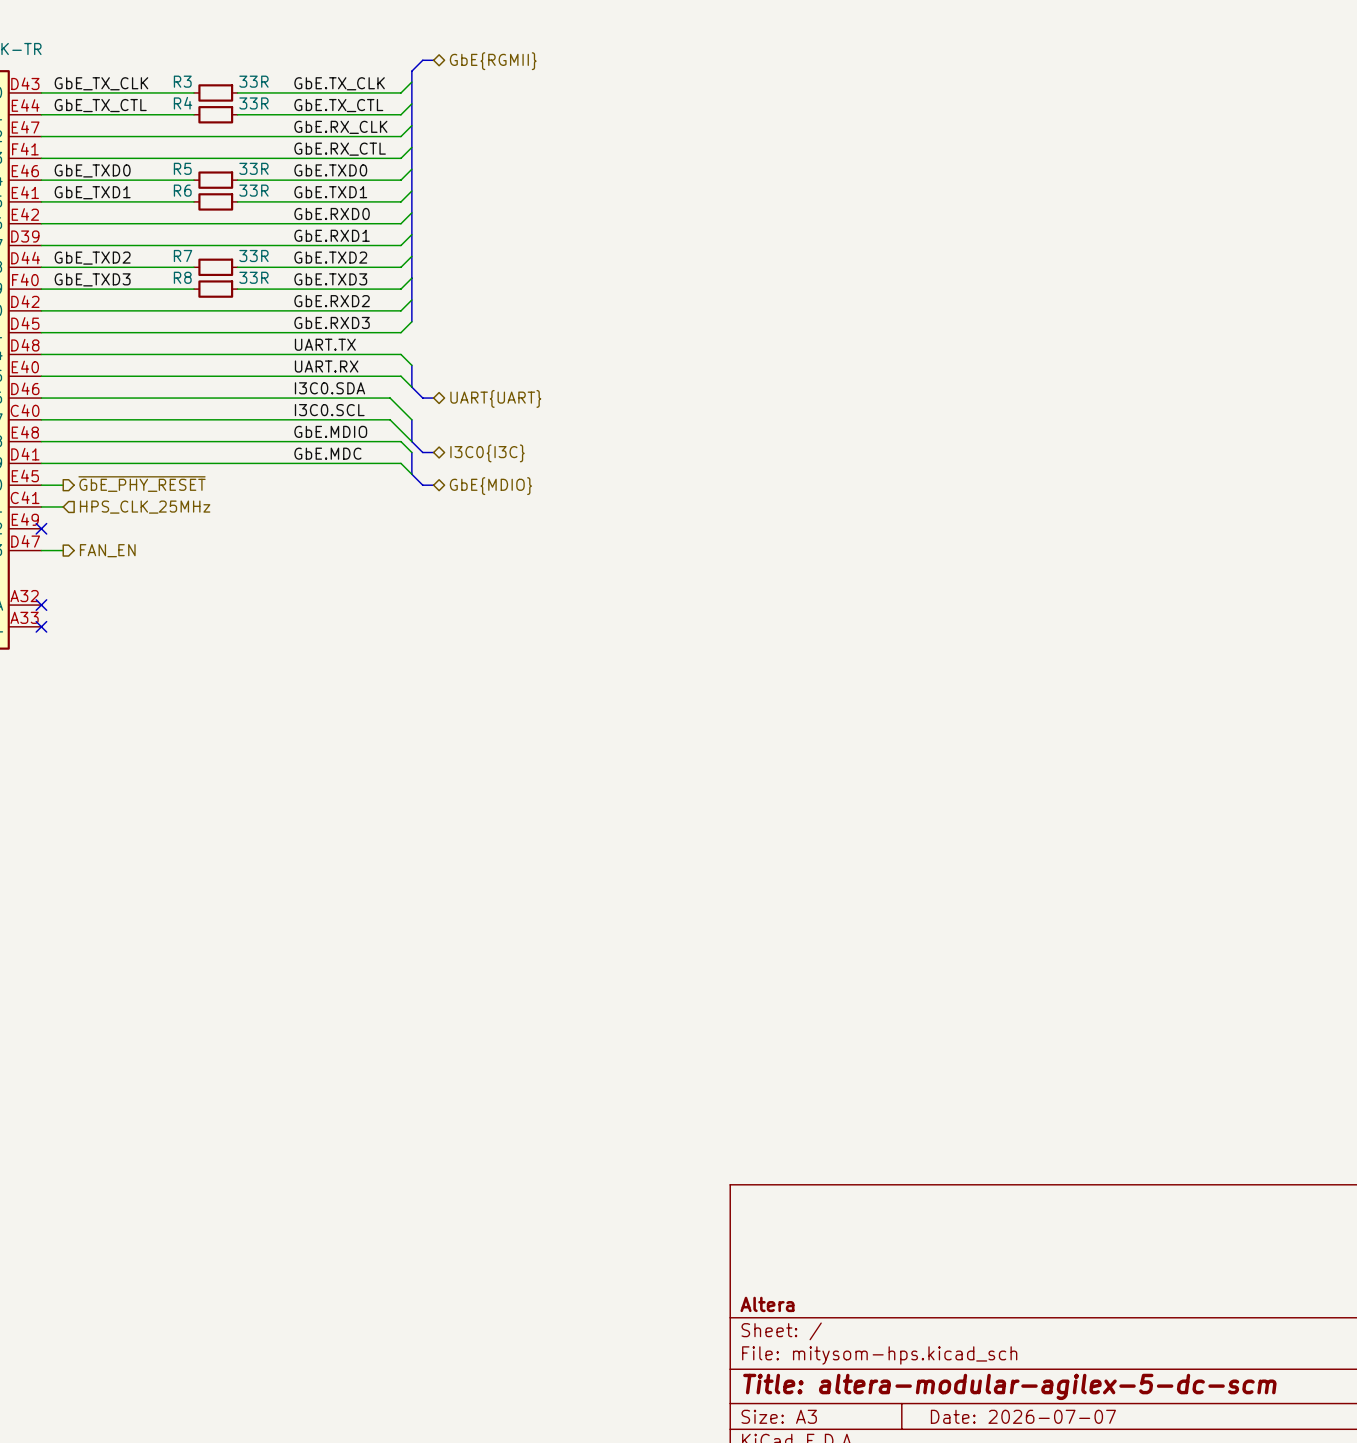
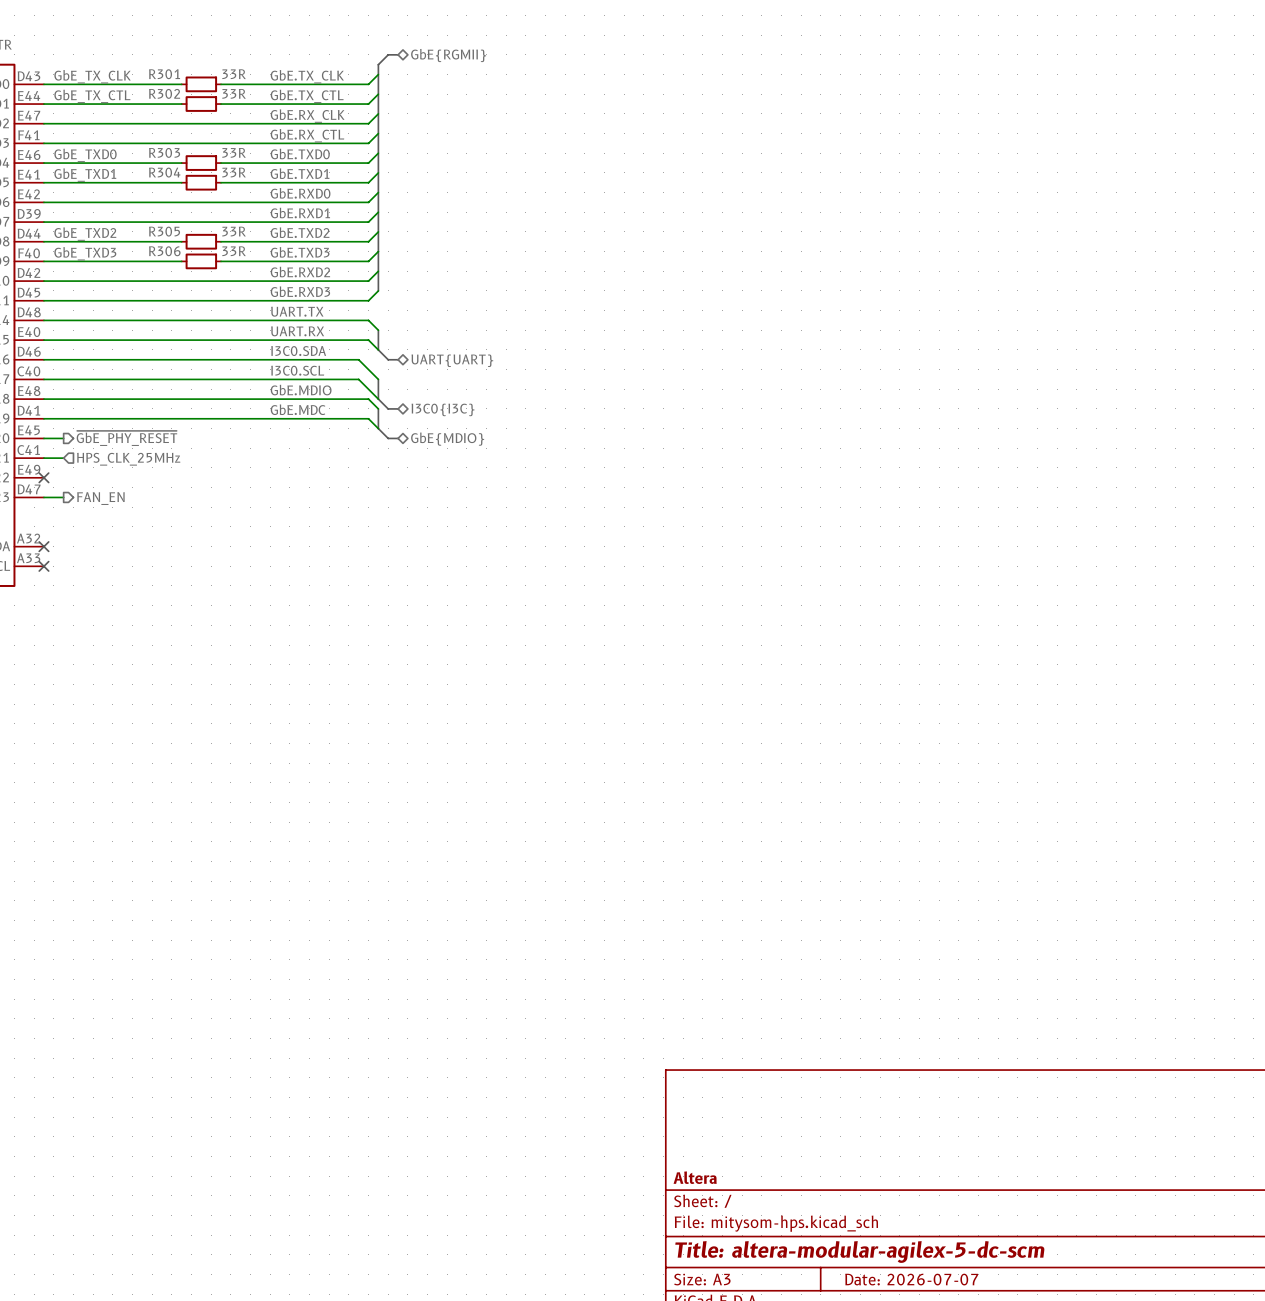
R3 name: R3 (182, 81) -> R301 (164, 74)
R4 name: R4 (183, 103) -> R302 (164, 93)
R5 name: R5 (182, 168) -> R303 (164, 152)
R6 name: R6 (182, 190) -> R304 (164, 172)
R7 name: R7 (183, 255) -> R305 (164, 231)
R8 name: R8 (182, 277) -> R306 (164, 251)

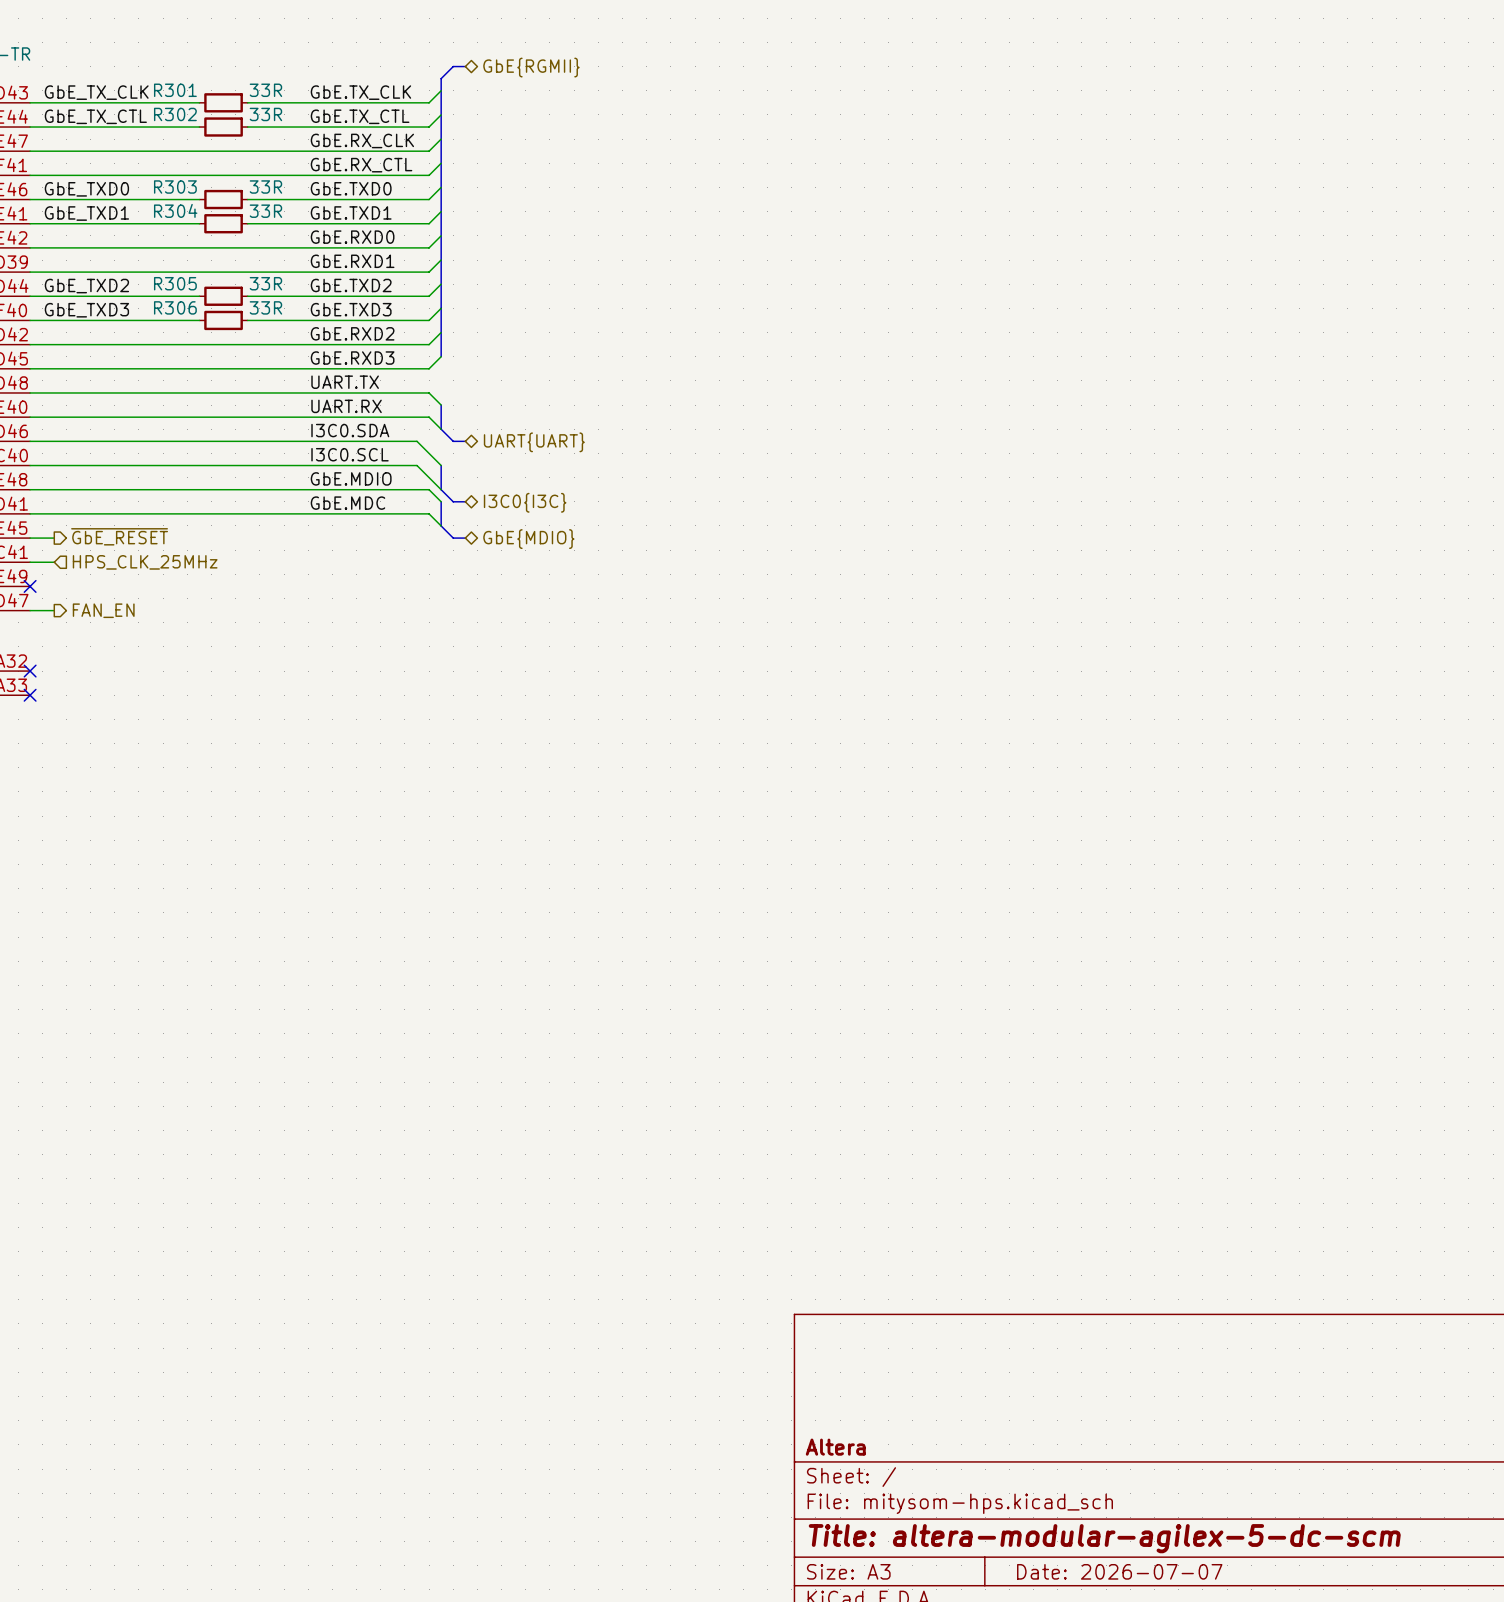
hierarchical label: ~{GbE_PHY_RESET} (126, 438) -> ~{GbE_RESET} (119, 536)

